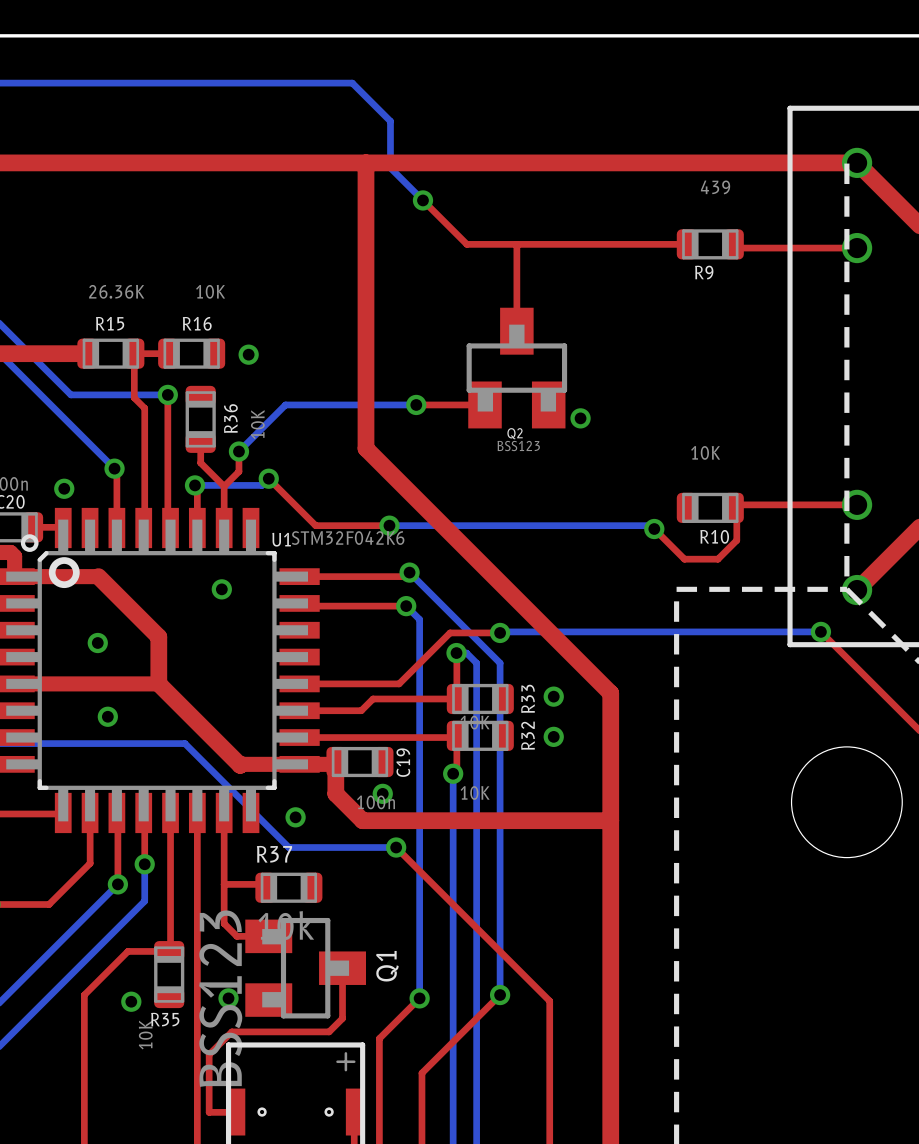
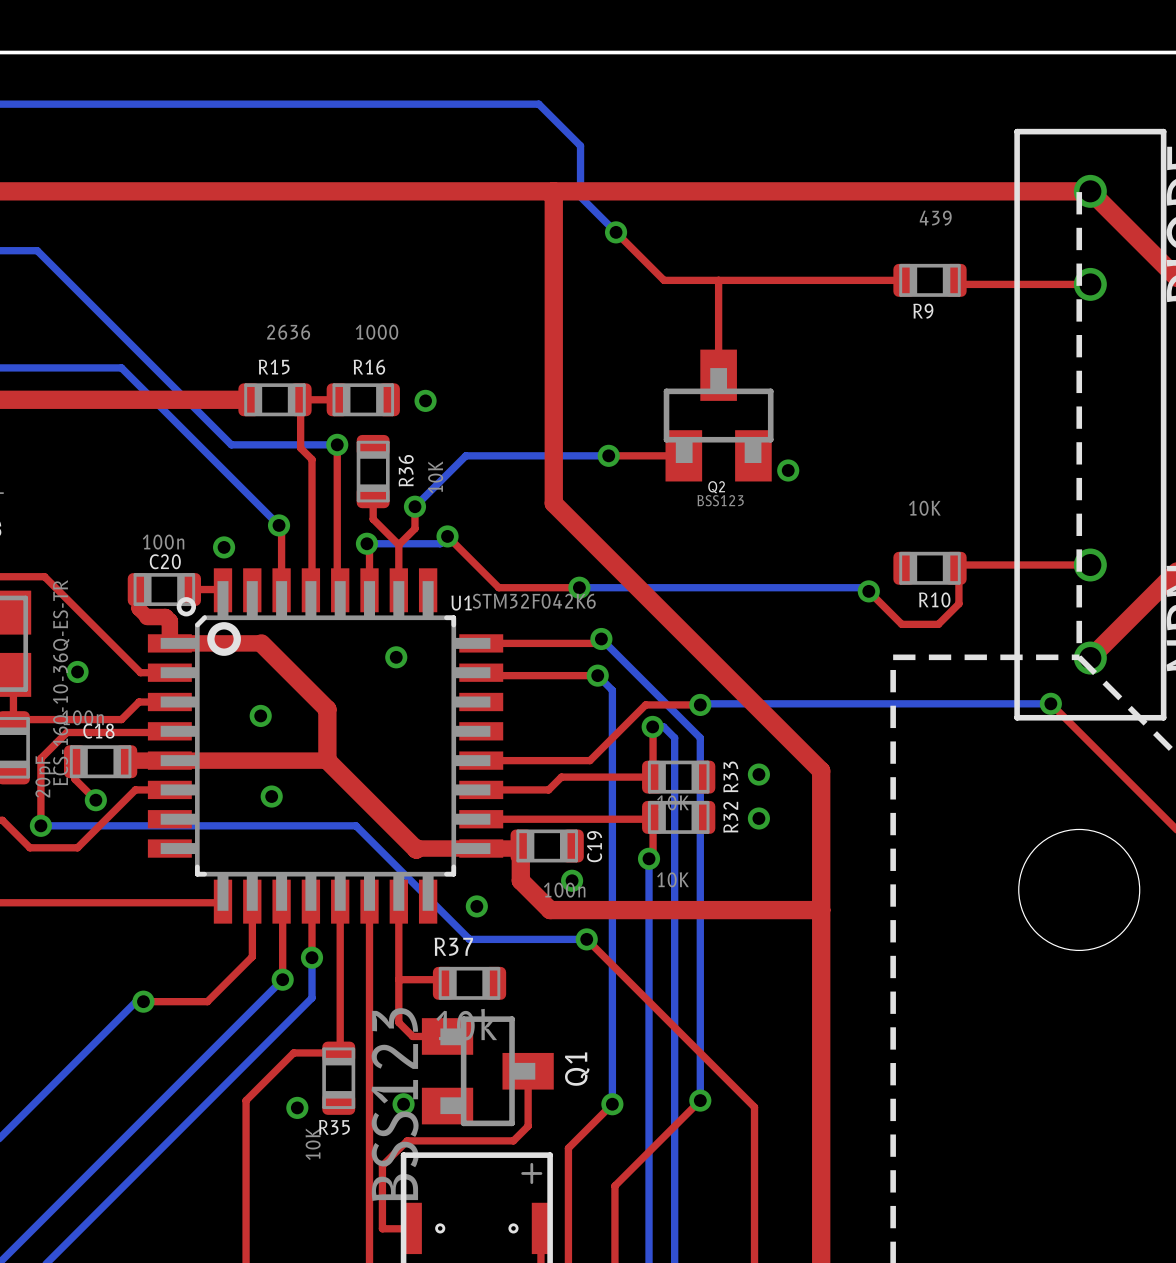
R15 value: 26.36K (116, 291) -> 2636 (288, 332)
R16 value: 10K (210, 291) -> 1000 (377, 332)

